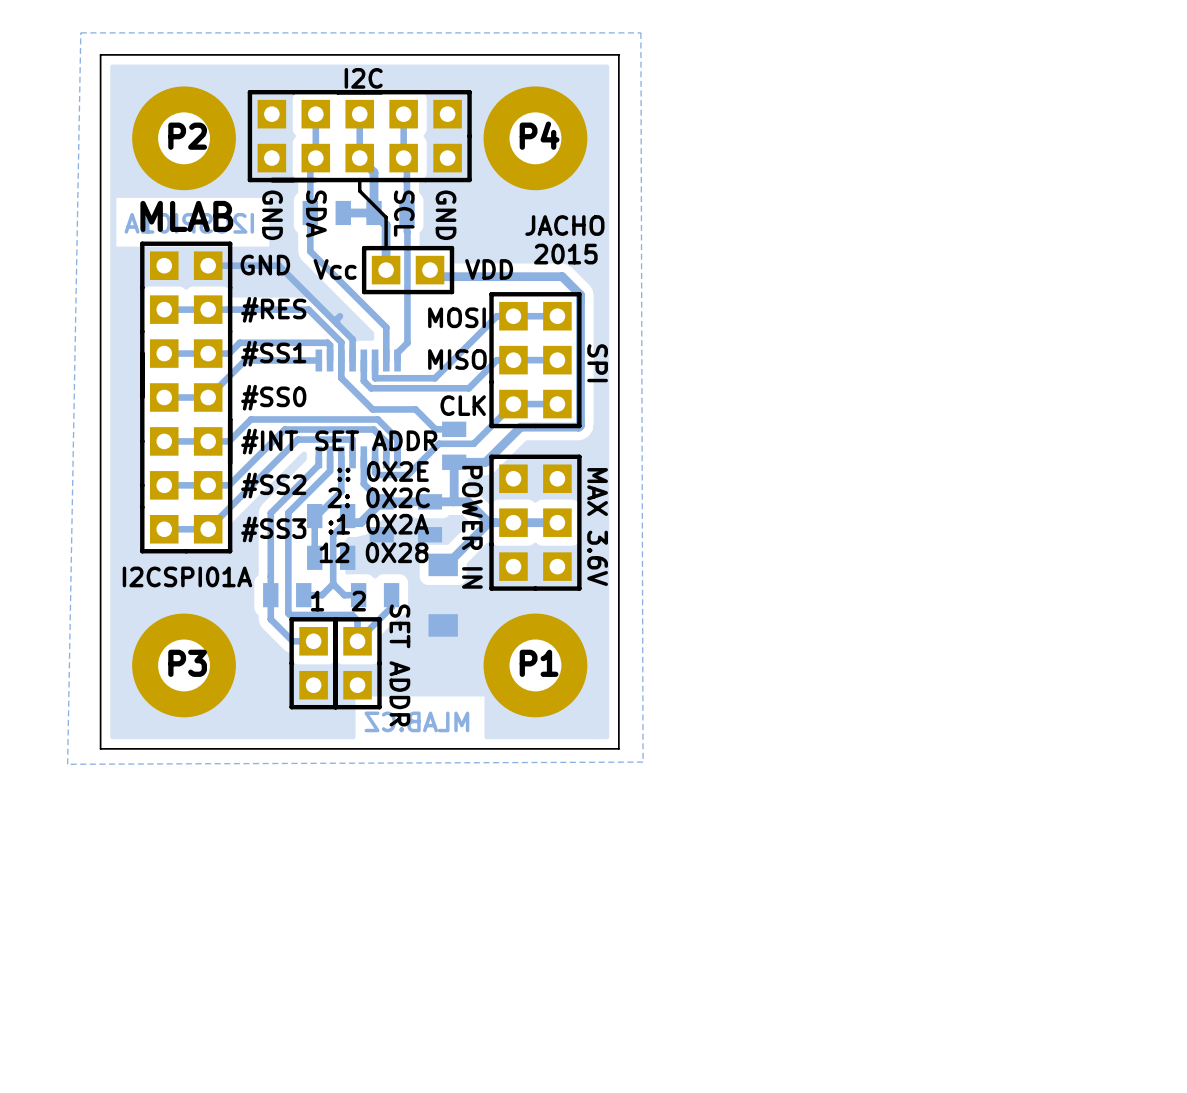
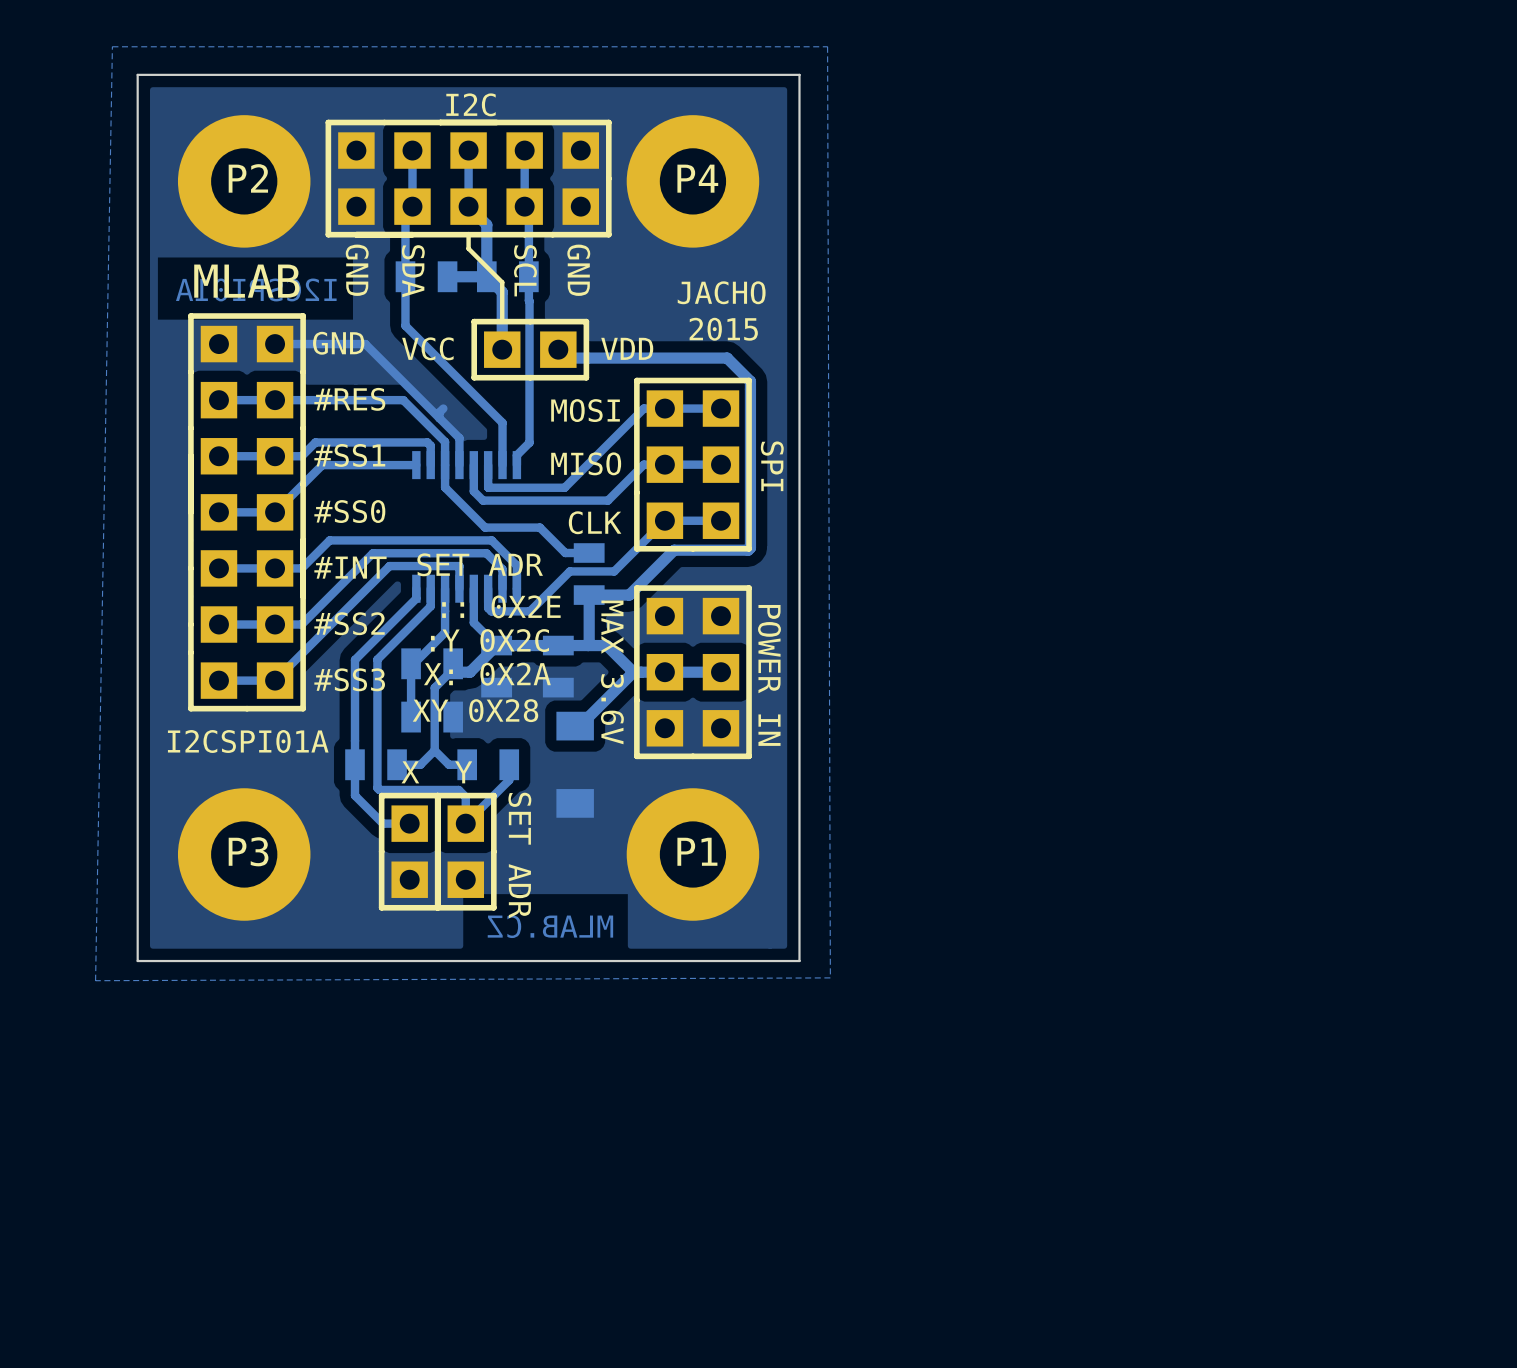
text: Vcc (335, 269) -> VCC (427, 348)
text: SET ADDR (376, 440) -> SET ADR (480, 564)
text: 2: 0X2C (378, 497) -> :Y 0X2C (489, 640)
text: :1 0X2A (378, 524) -> X: 0X2A (487, 674)
text position: POWER IN (472, 527) -> POWER IN (769, 675)
text position: MAX 3.6V (597, 527) -> MAX 3.6V (612, 672)
text: 12 0X28 (374, 552) -> XY 0X28 (475, 710)
text: 1 (317, 601) -> X (410, 772)
text: 2 (358, 601) -> Y (463, 772)
text: SET ADDR (399, 665) -> SET ADR (519, 855)

